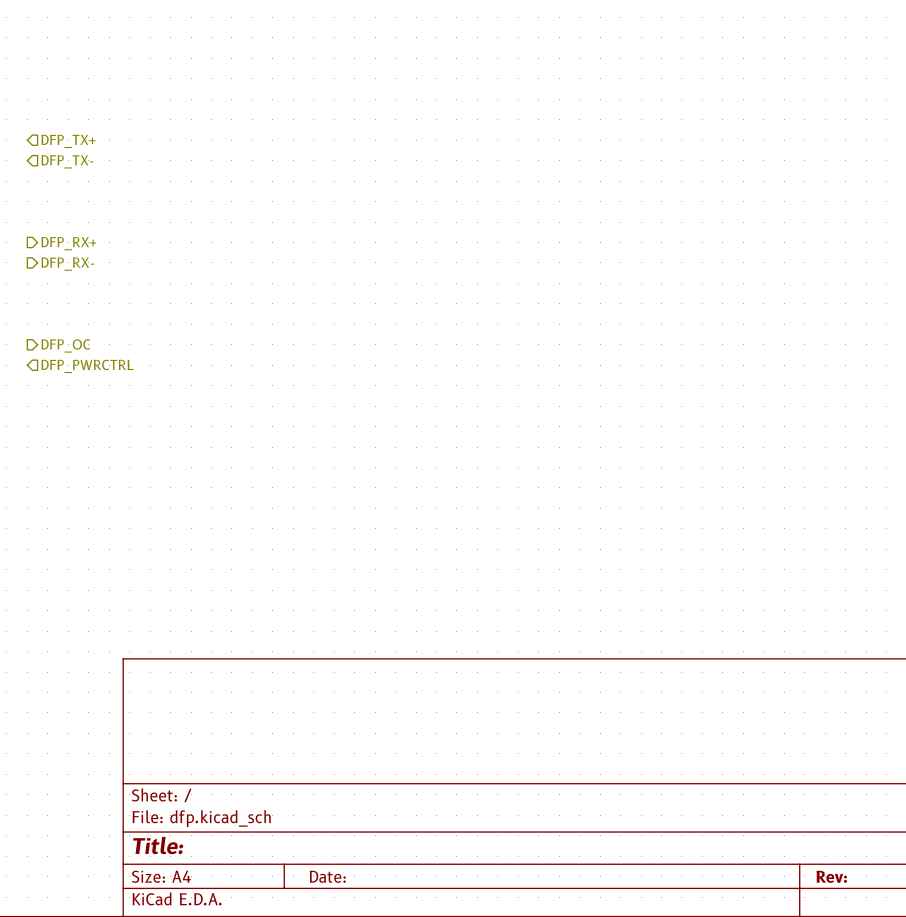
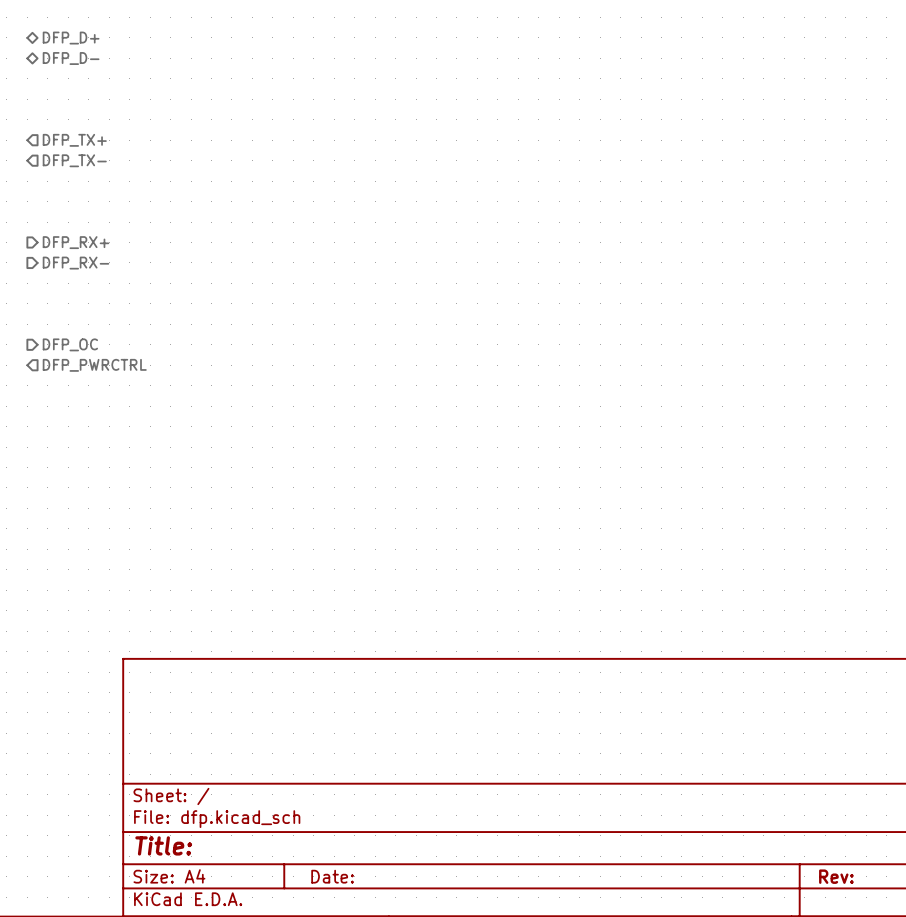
hierarchical label: none -> DFP_D+ (71, 38)
hierarchical label: none -> DFP_D- (71, 58)

